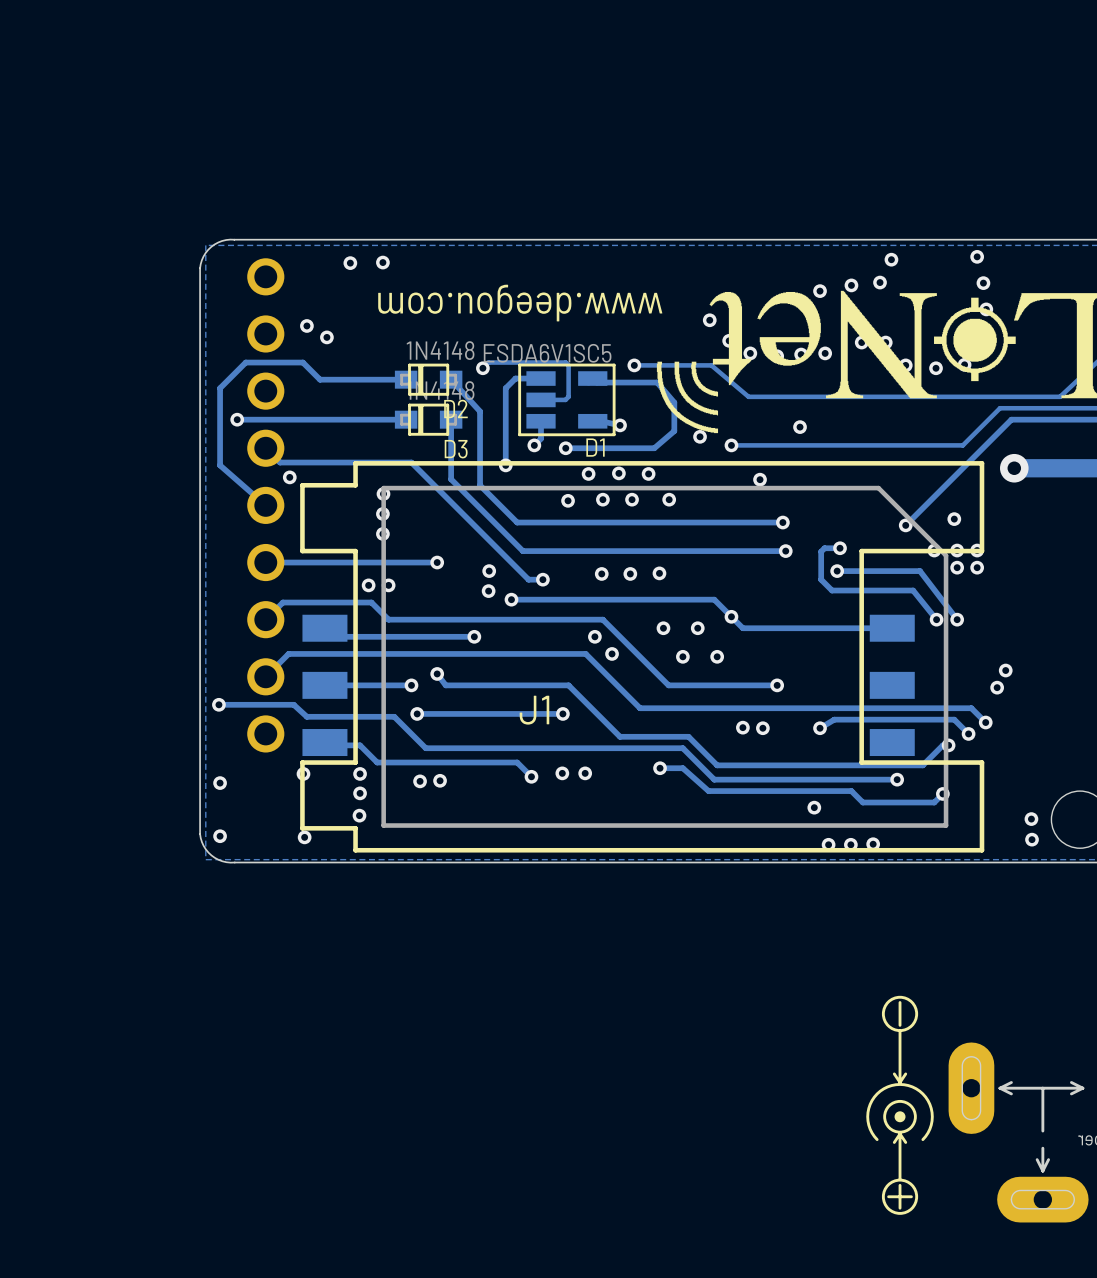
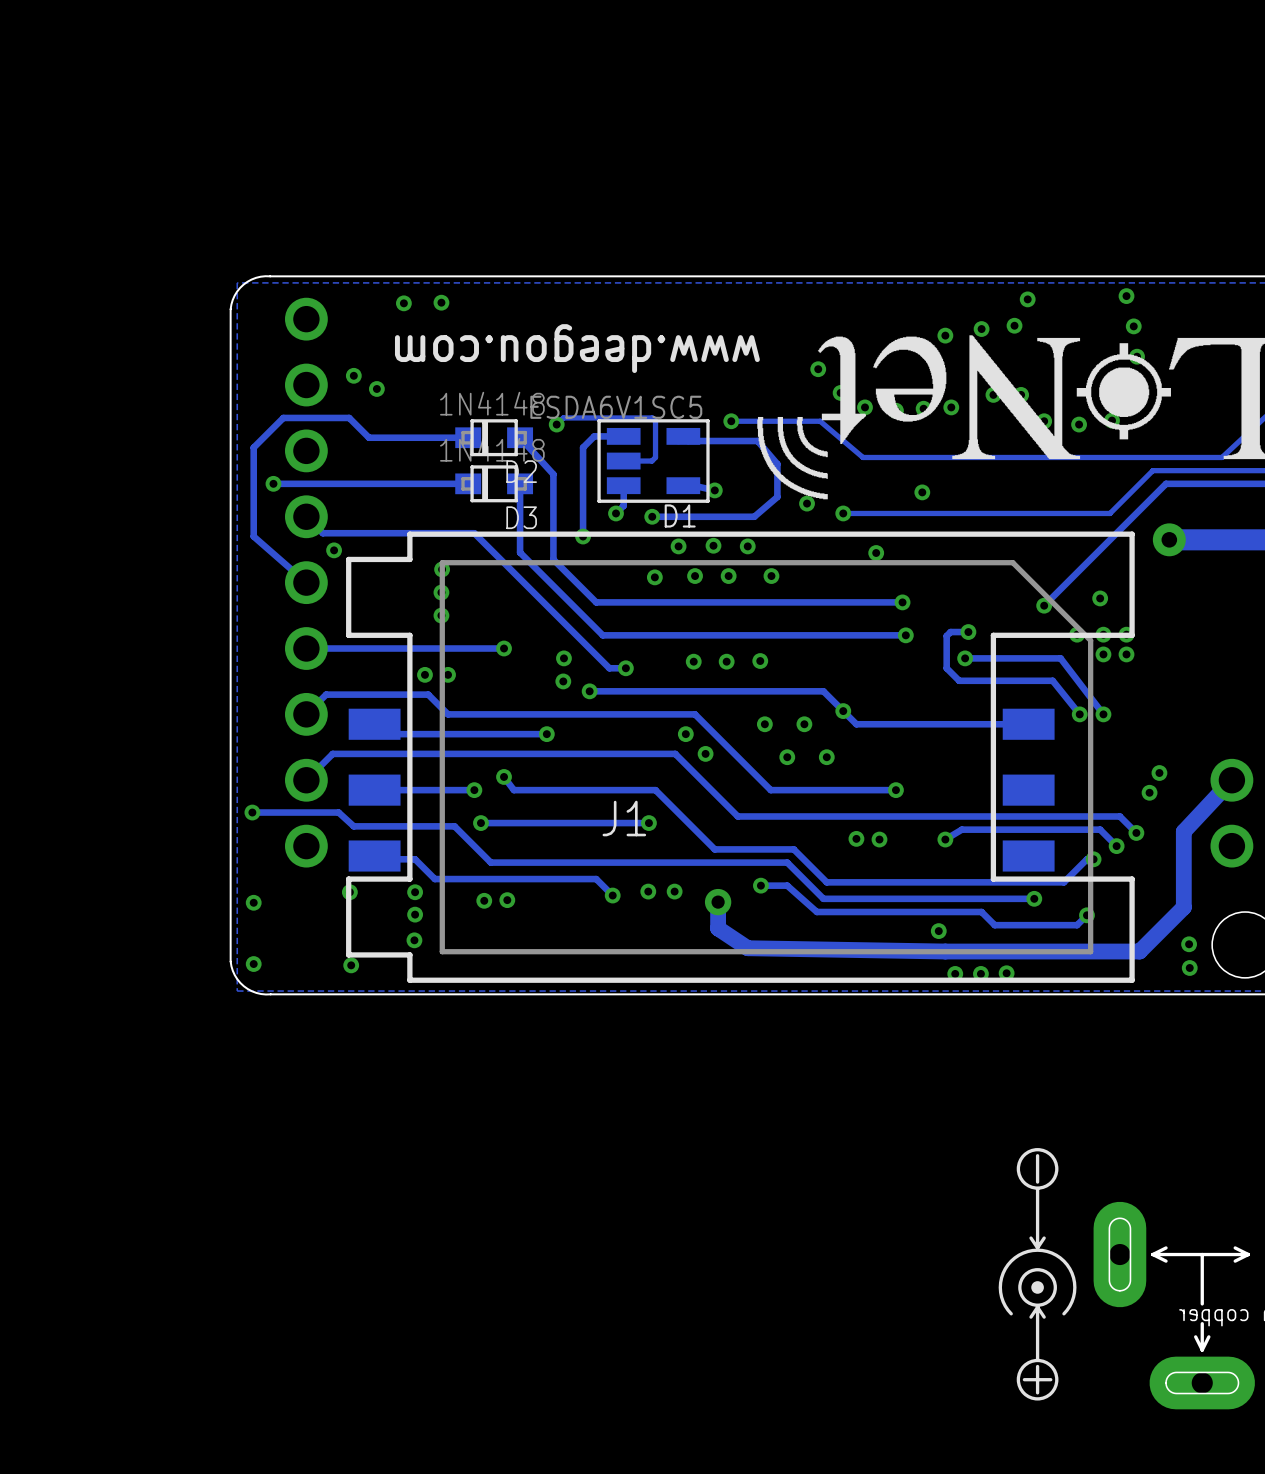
track: none -> (1231, 780) (1183, 831) (1183, 907) (1139, 951) (945, 951) (747, 948) (718, 928) (718, 902)
part: none -> (1231, 813)
via: none -> (718, 902)

